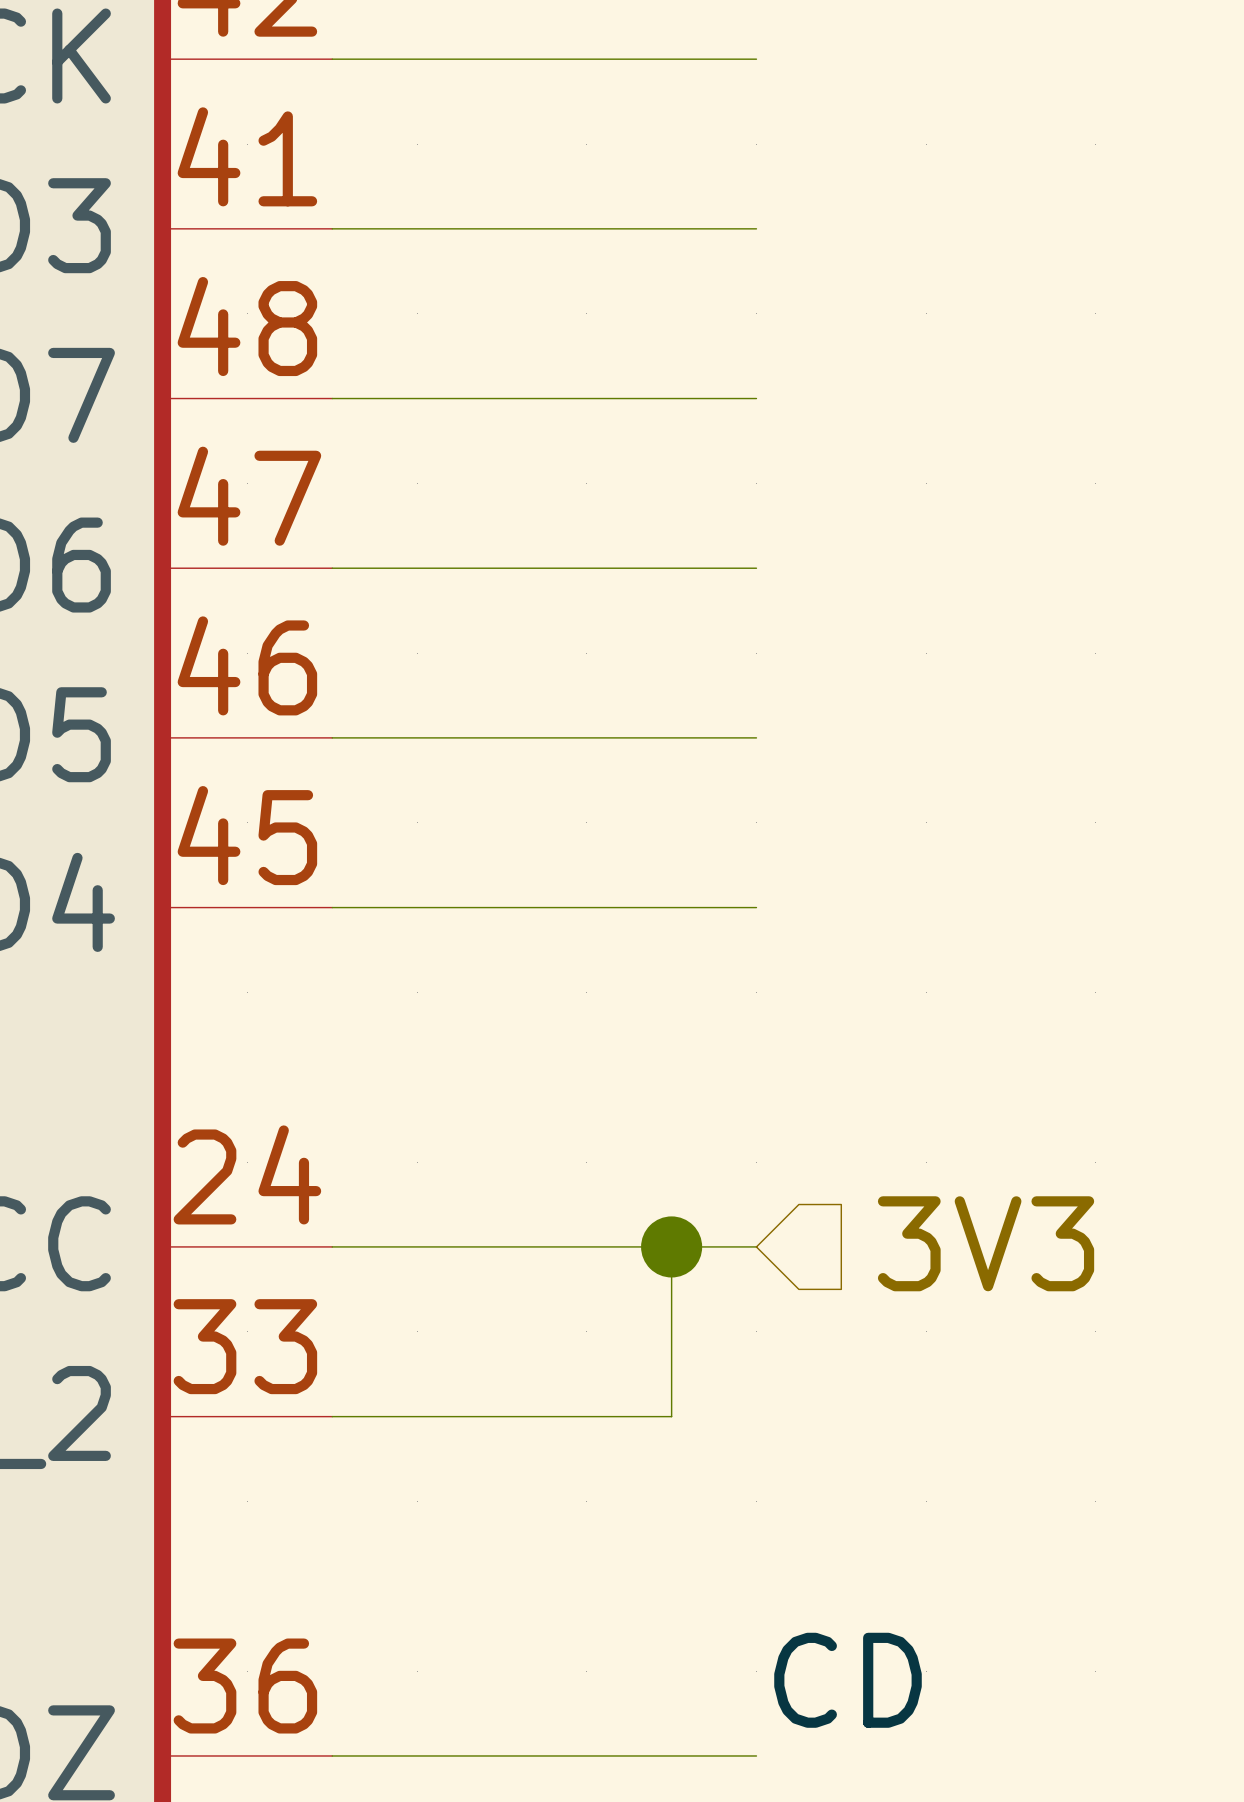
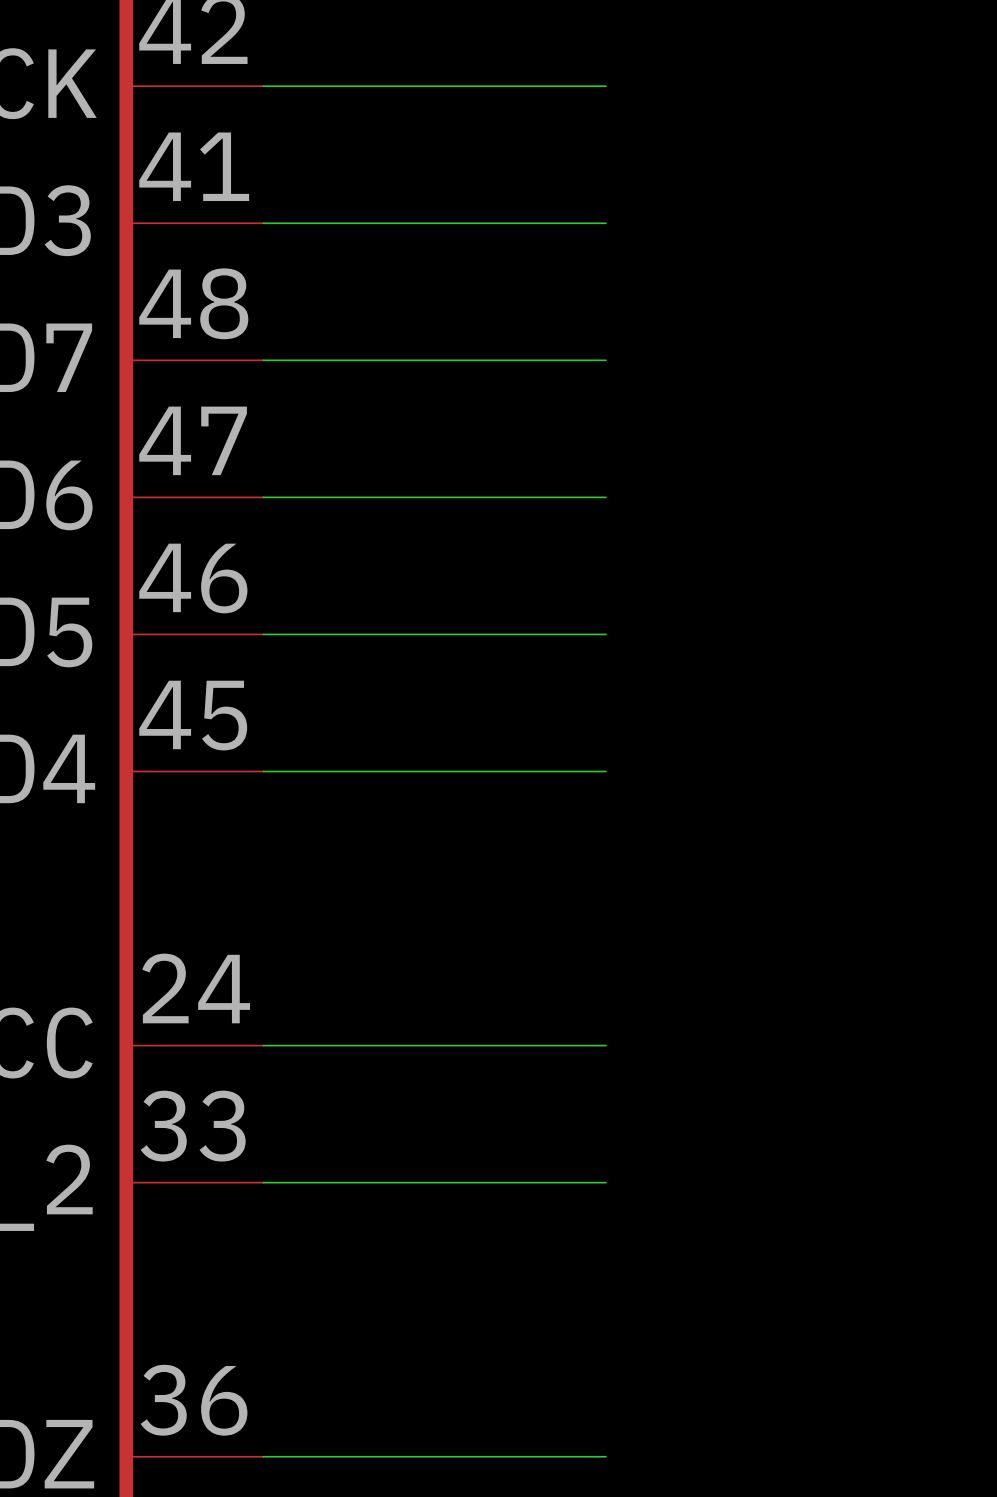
hierarchical label: 3V3 (986, 1243) -> none
wire: (671, 1246) (671, 1416) -> (605, 1182) (537, 1182)
junction: (671, 1246) -> none
label: CD (848, 1680) -> none

